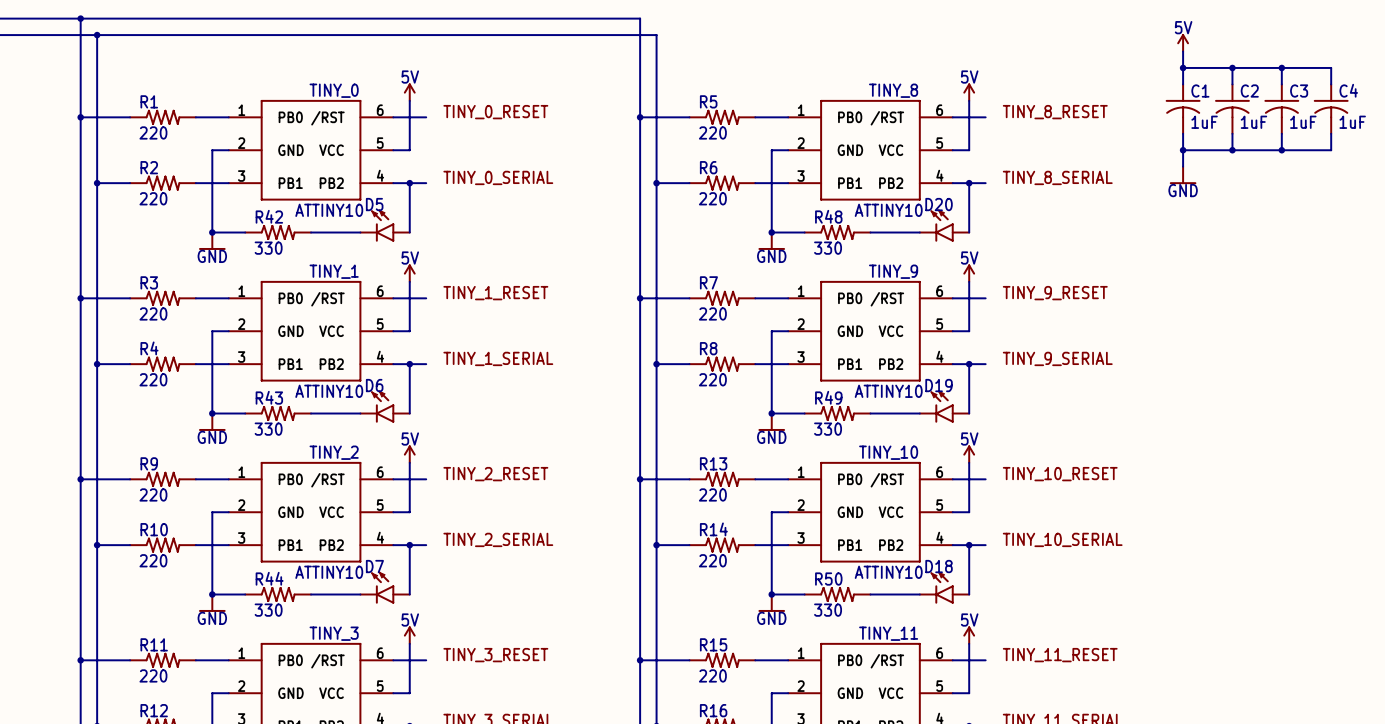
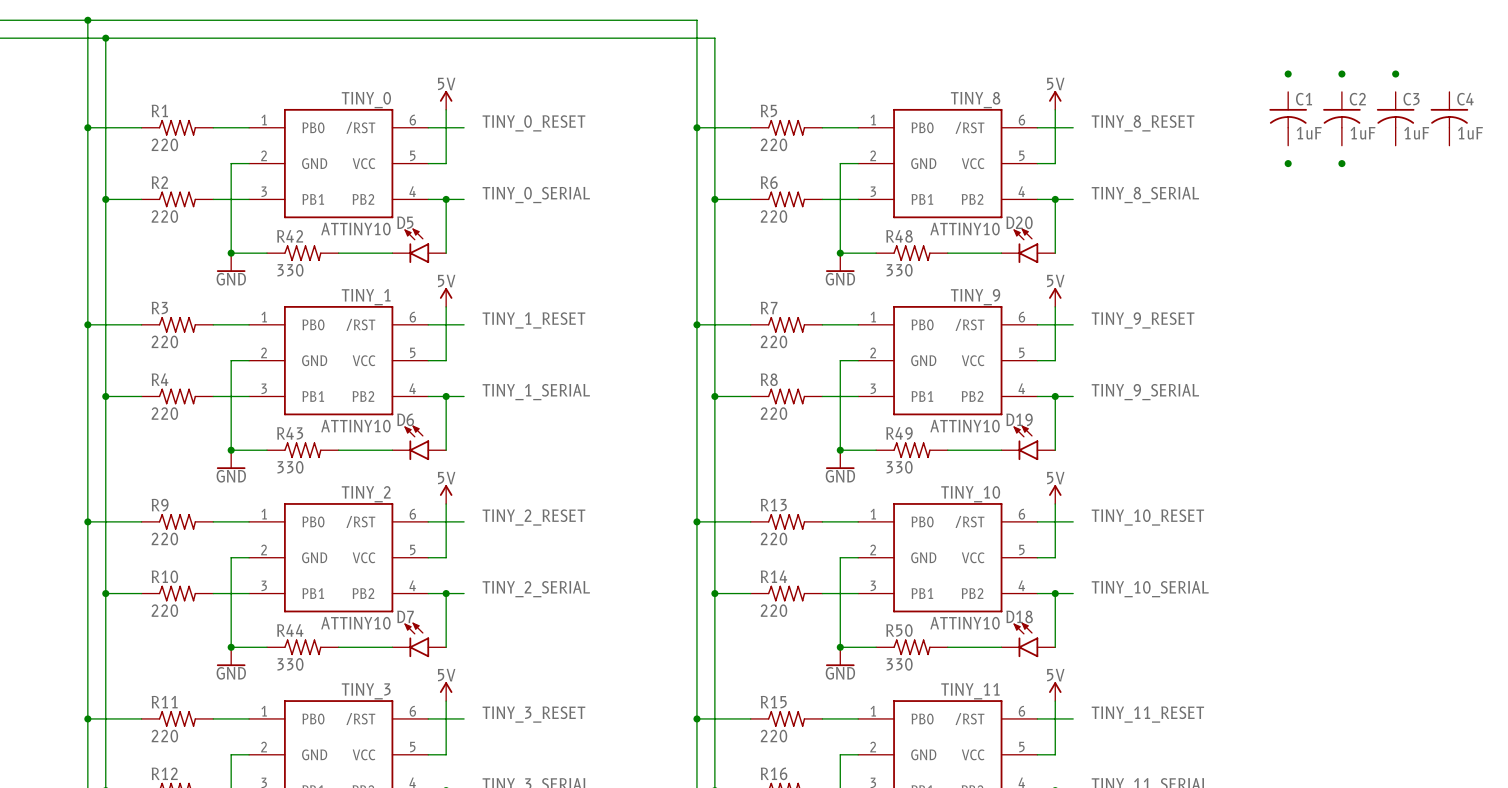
power symbol: 5V (1183, 42) -> none
wire: (1183, 51) (1183, 84) -> none
wire: (1183, 67) (1331, 67) (1331, 84) -> none
wire: (1232, 67) (1232, 84) -> none
wire: (1281, 67) (1281, 84) -> none
wire: (1183, 133) (1183, 166) -> none
wire: (1232, 133) (1232, 150) -> none
wire: (1281, 133) (1281, 150) -> none
wire: (1331, 133) (1331, 150) (1183, 150) -> none
junction: (1281, 150) -> none
power symbol: GND (1183, 175) -> none

